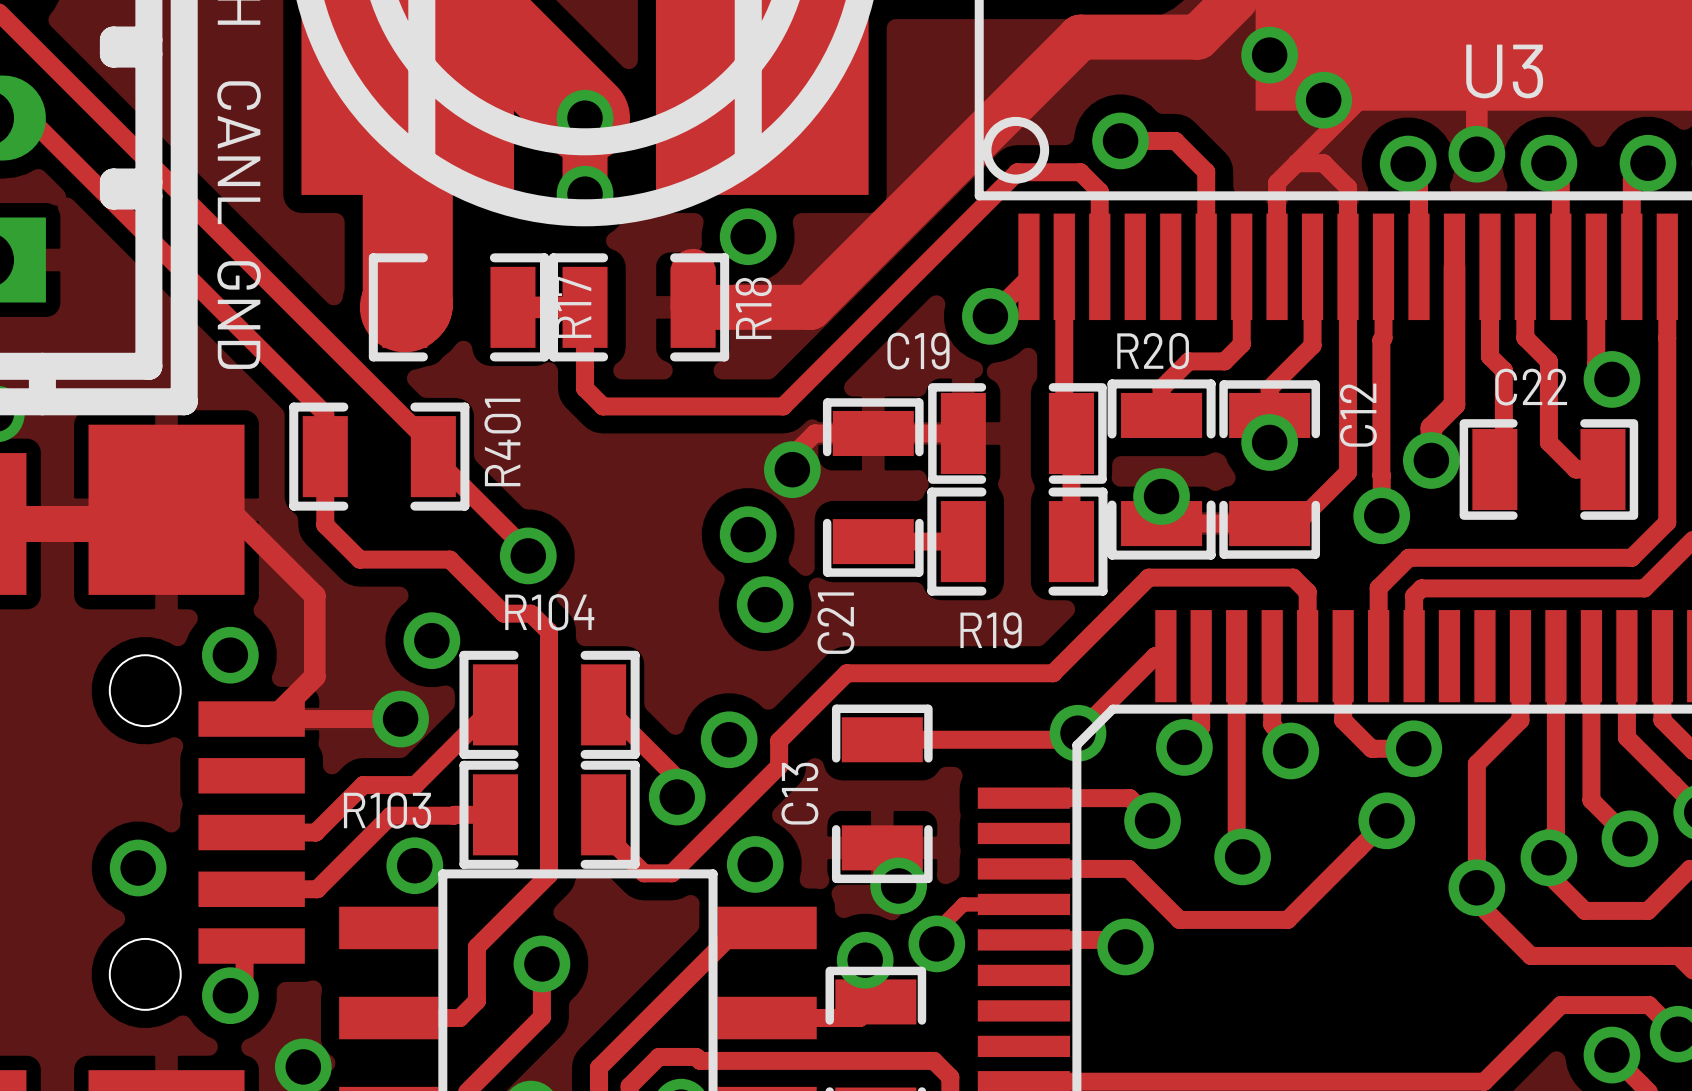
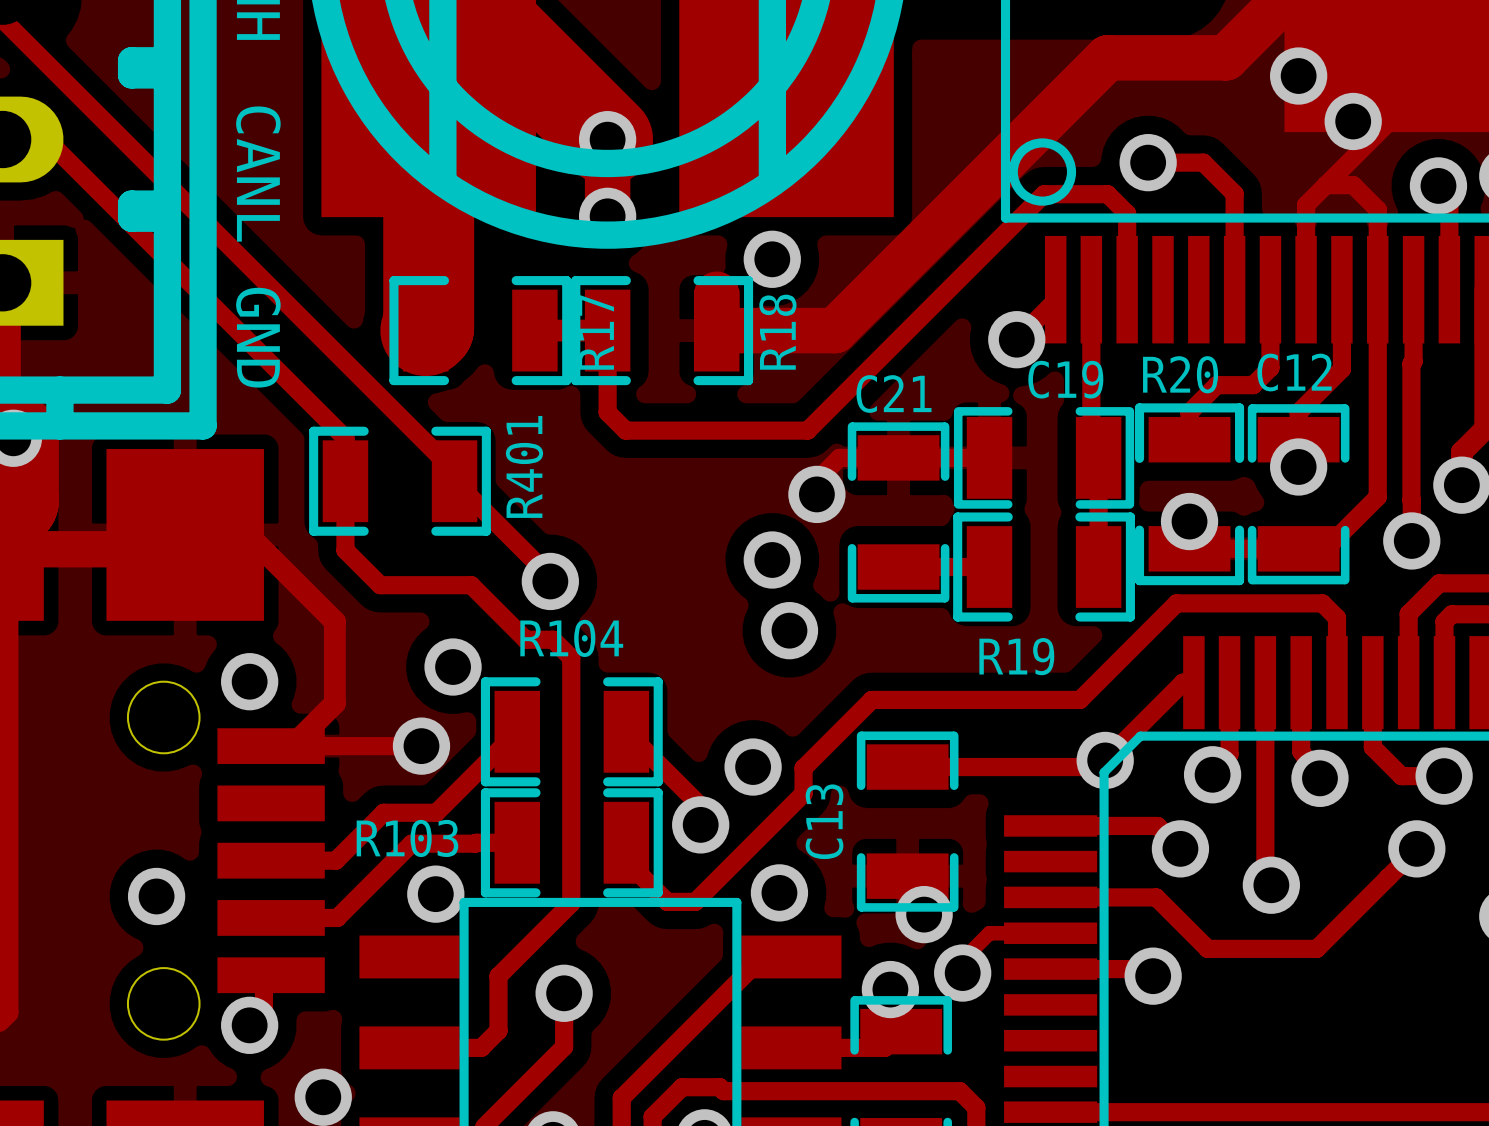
C19 name position: C19 (918, 351) -> C19 (1065, 379)
C12 name rotation: 0° (1358, 415) -> 90° clockwise (1294, 372)
C12 name position: C12 (1358, 415) -> C12 (1294, 372)
C21 name rotation: 0° (835, 623) -> 90° clockwise (894, 393)
C21 name position: C21 (835, 623) -> C21 (894, 393)

